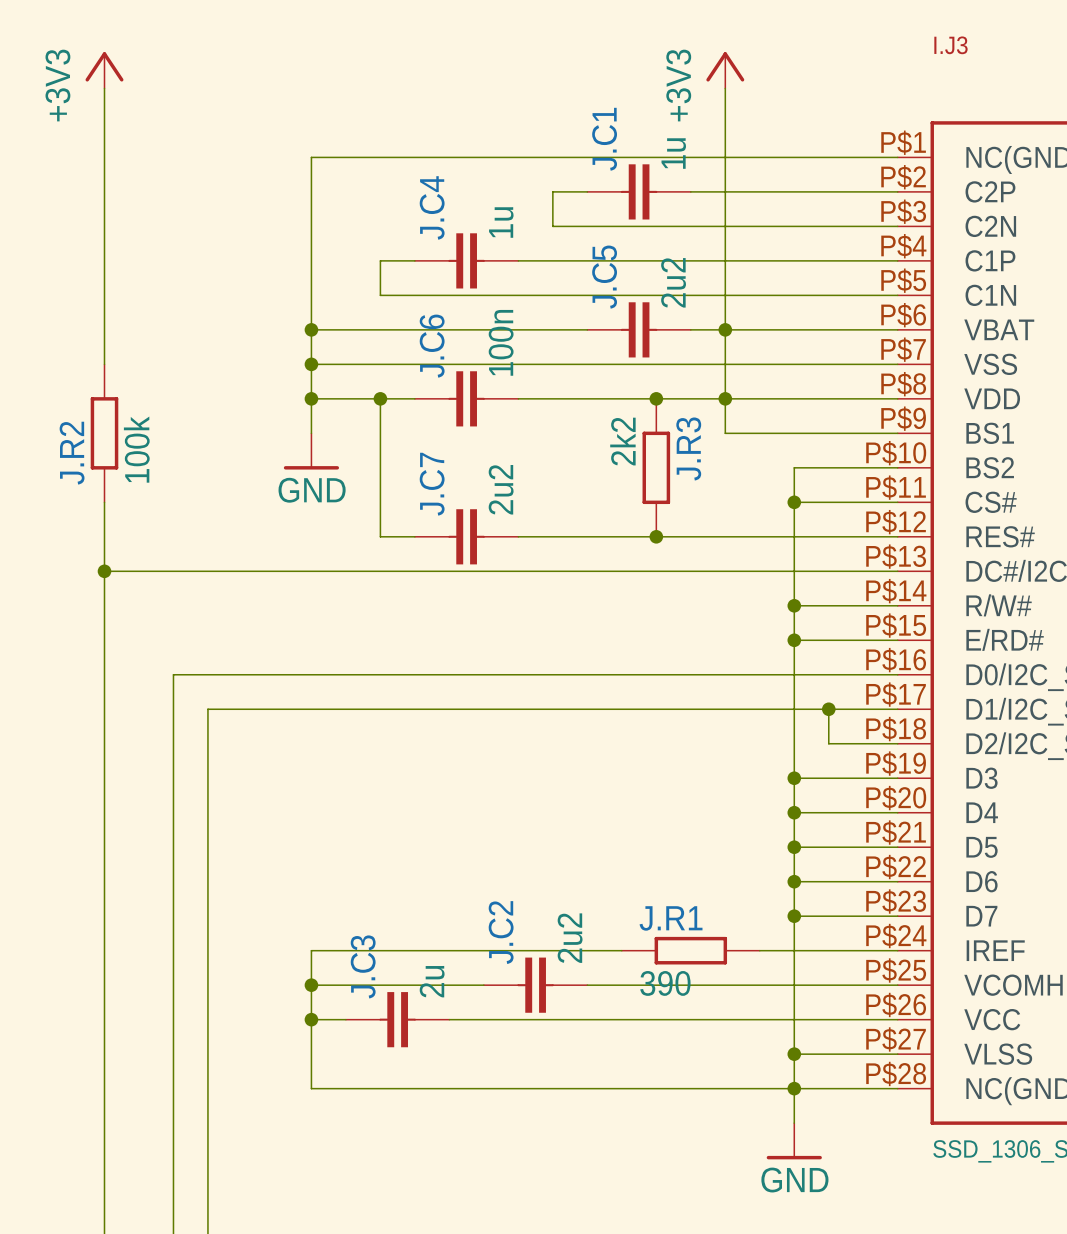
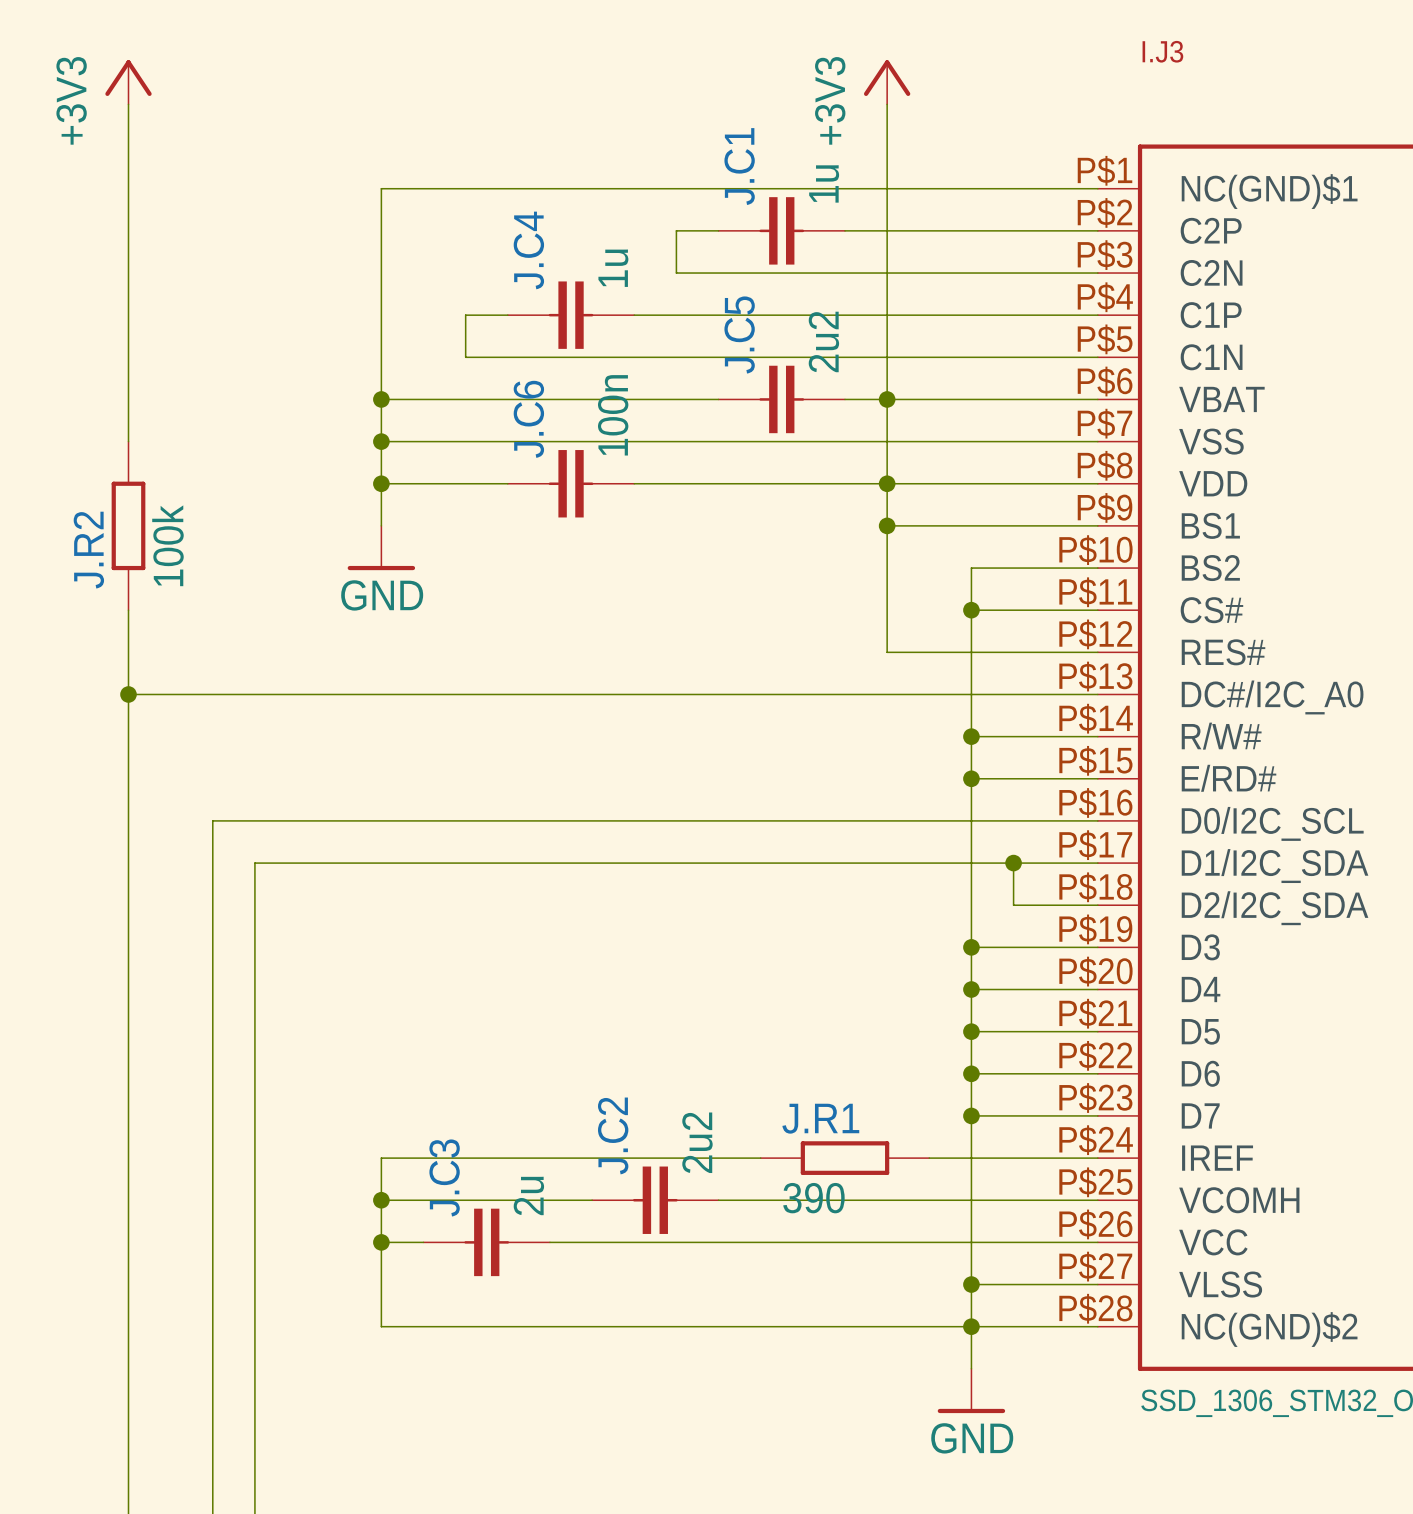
wire: (380, 398) (380, 536) (414, 536) -> none
junction: (380, 398) -> none
junction: (656, 398) -> none
junction: none -> (887, 525)
J.R3: 2k2 (656, 467) -> none
J.C7: 2u2 (466, 536) -> none
wire: (518, 536) (725, 536) -> (887, 525) (887, 652)
junction: (656, 536) -> none

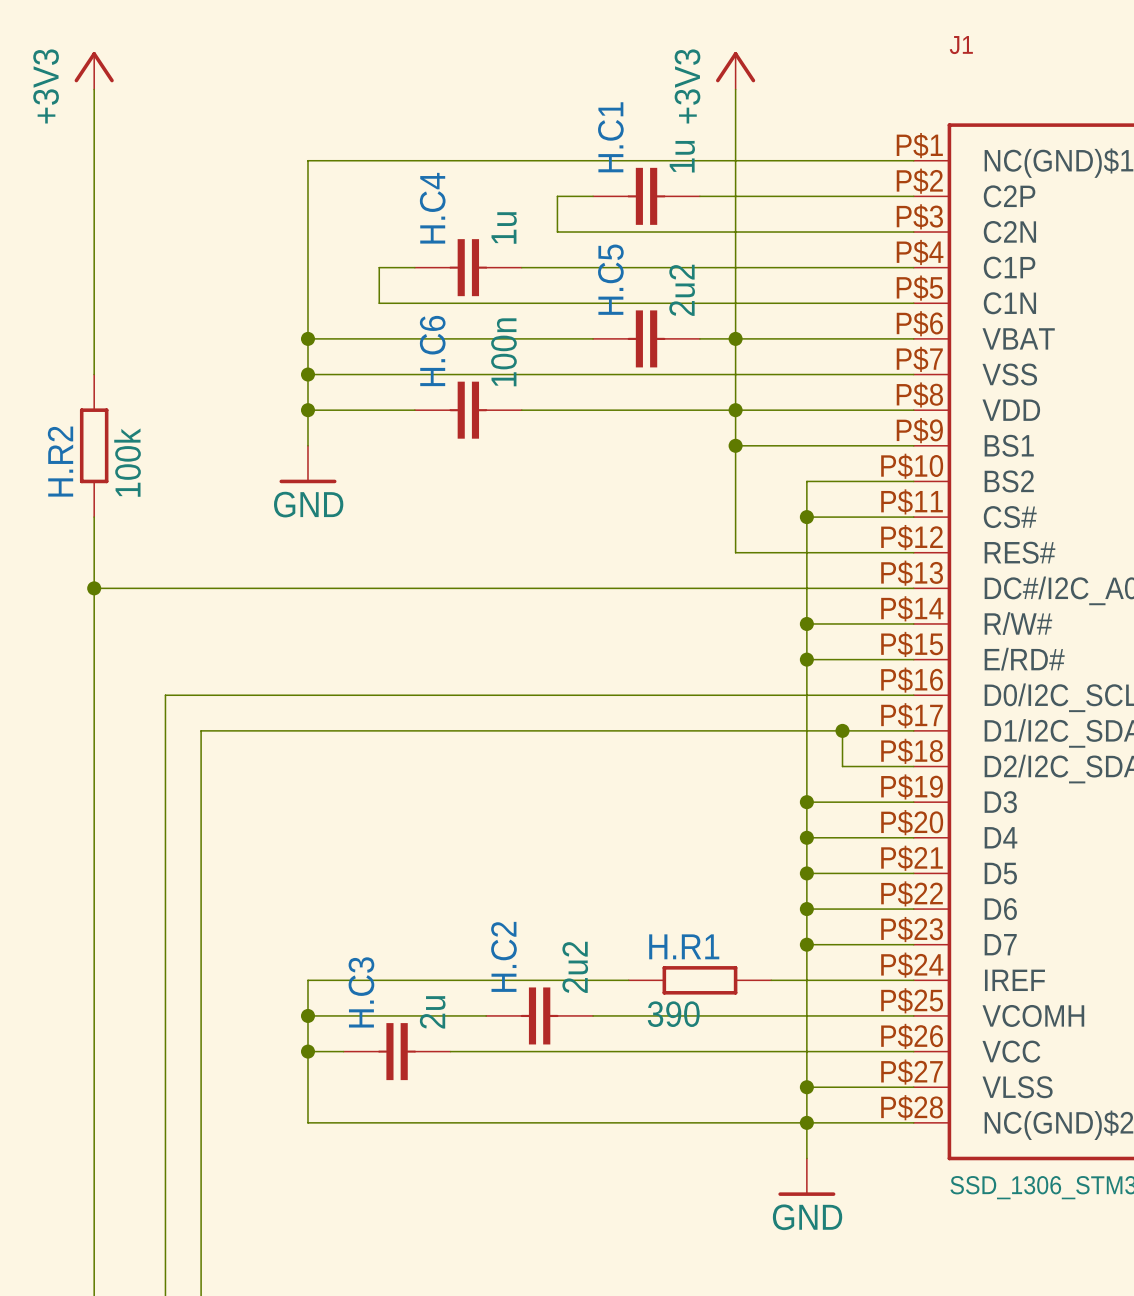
I.J3 name: I.J3 (1162, 51) -> J1 (961, 45)
J.C1 name: J.C1 (739, 166) -> H.C1 (610, 137)
J.C4 name: J.C4 (528, 250) -> H.C4 (432, 208)
J.C5 name: J.C5 (739, 335) -> H.C5 (610, 279)
J.C6 name: J.C6 (528, 419) -> H.C6 (432, 351)
J.R2 name: J.R2 (88, 550) -> H.R2 (60, 461)
J.R1 name: J.R1 (820, 1118) -> H.R1 (684, 946)
J.C2 name: J.C2 (613, 1135) -> H.C2 (503, 956)
J.C3 name: J.C3 (444, 1177) -> H.C3 (361, 992)

